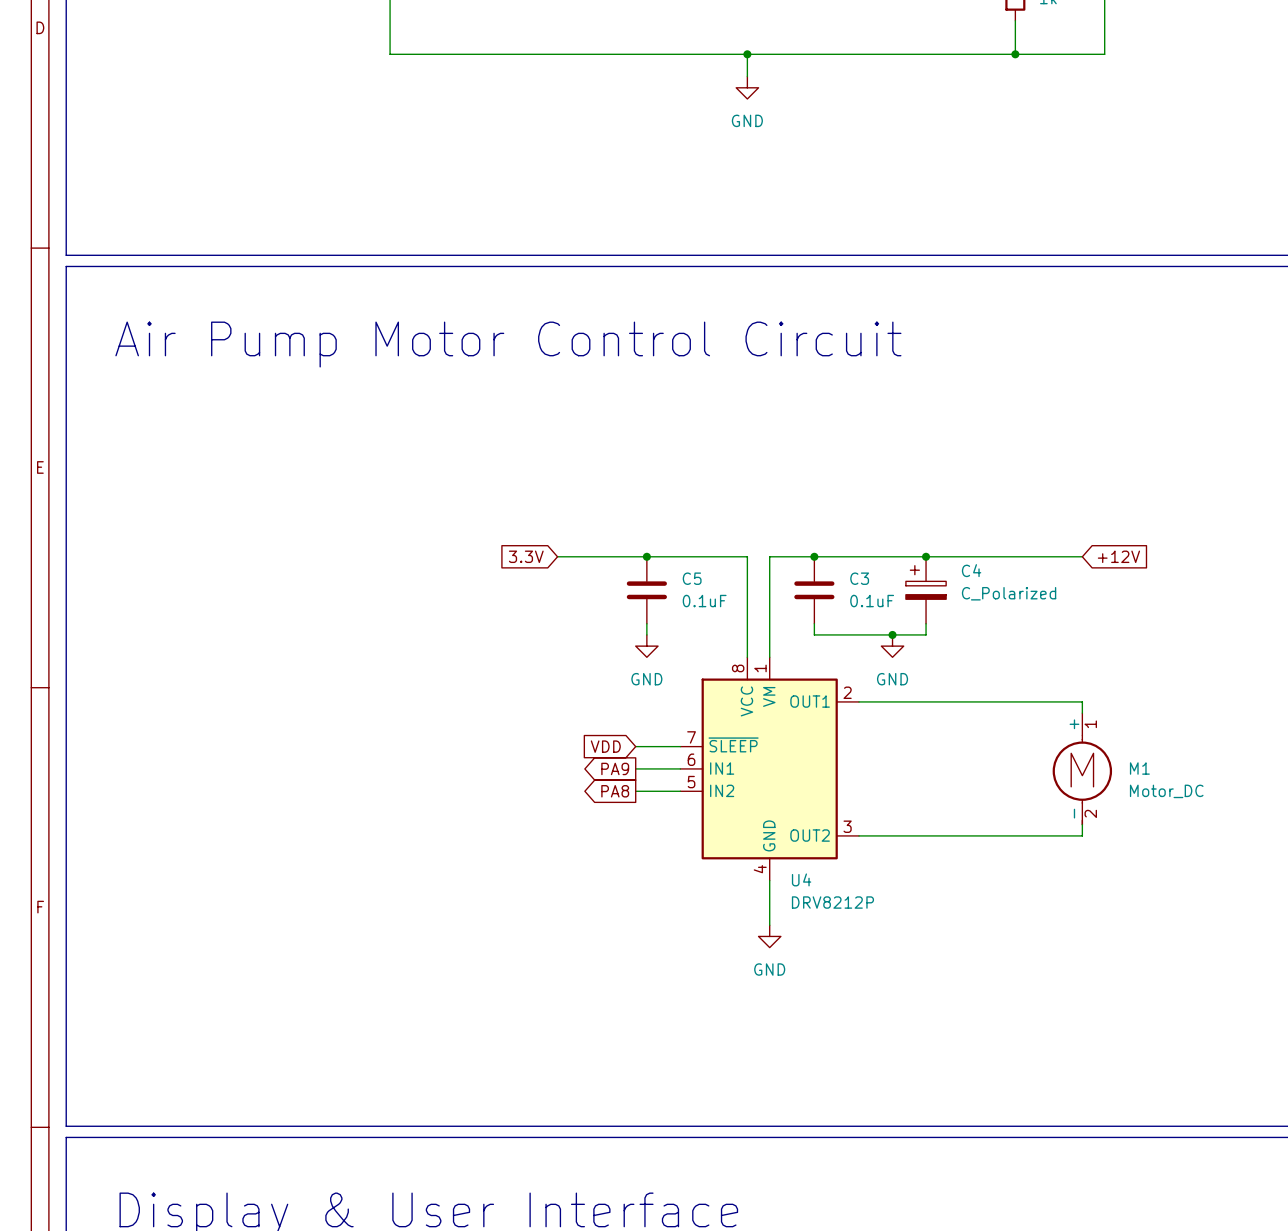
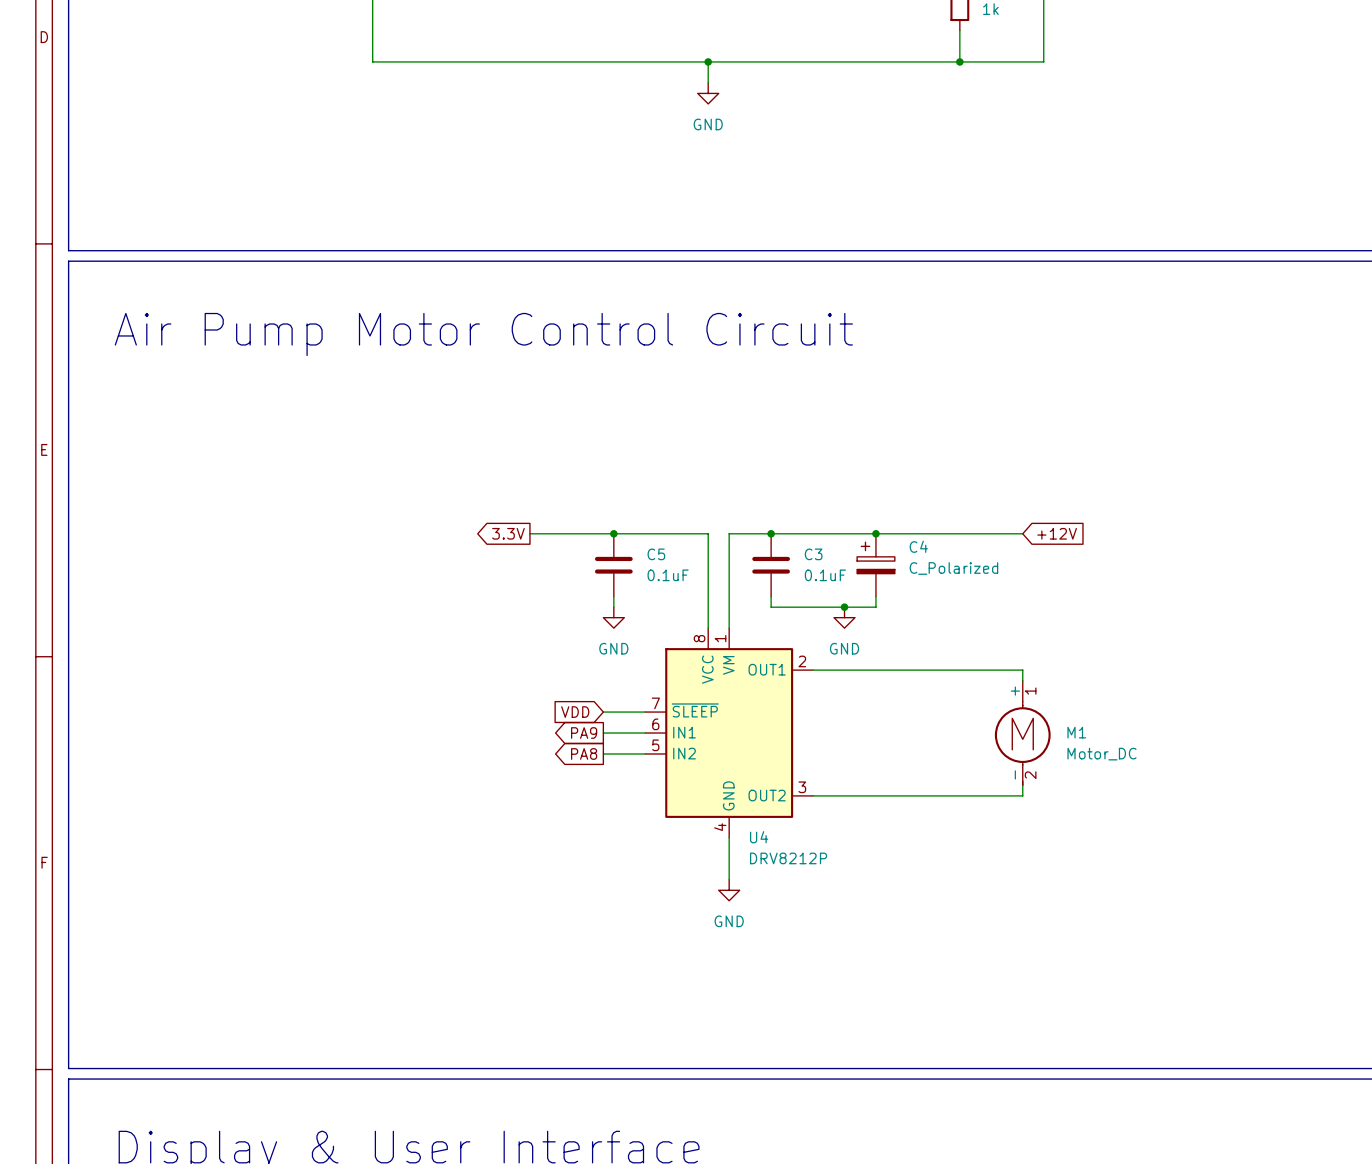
global label shape: input (526, 556) -> output (508, 533)

